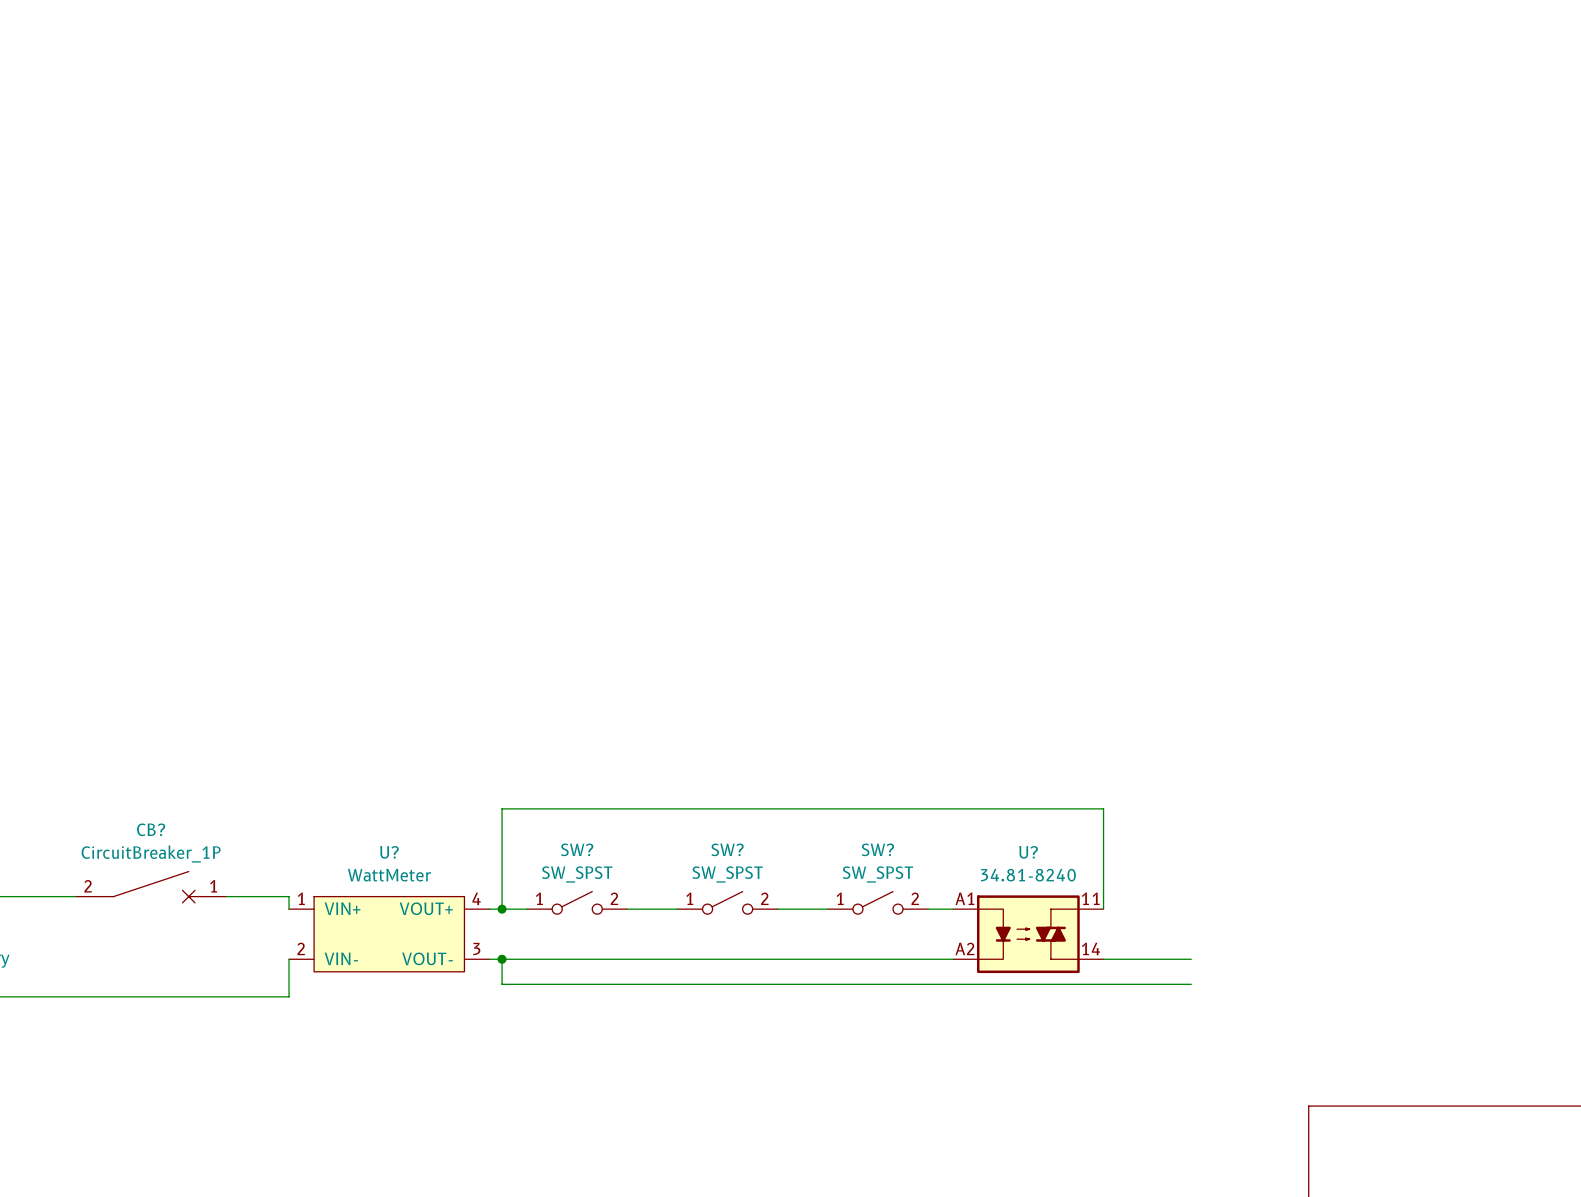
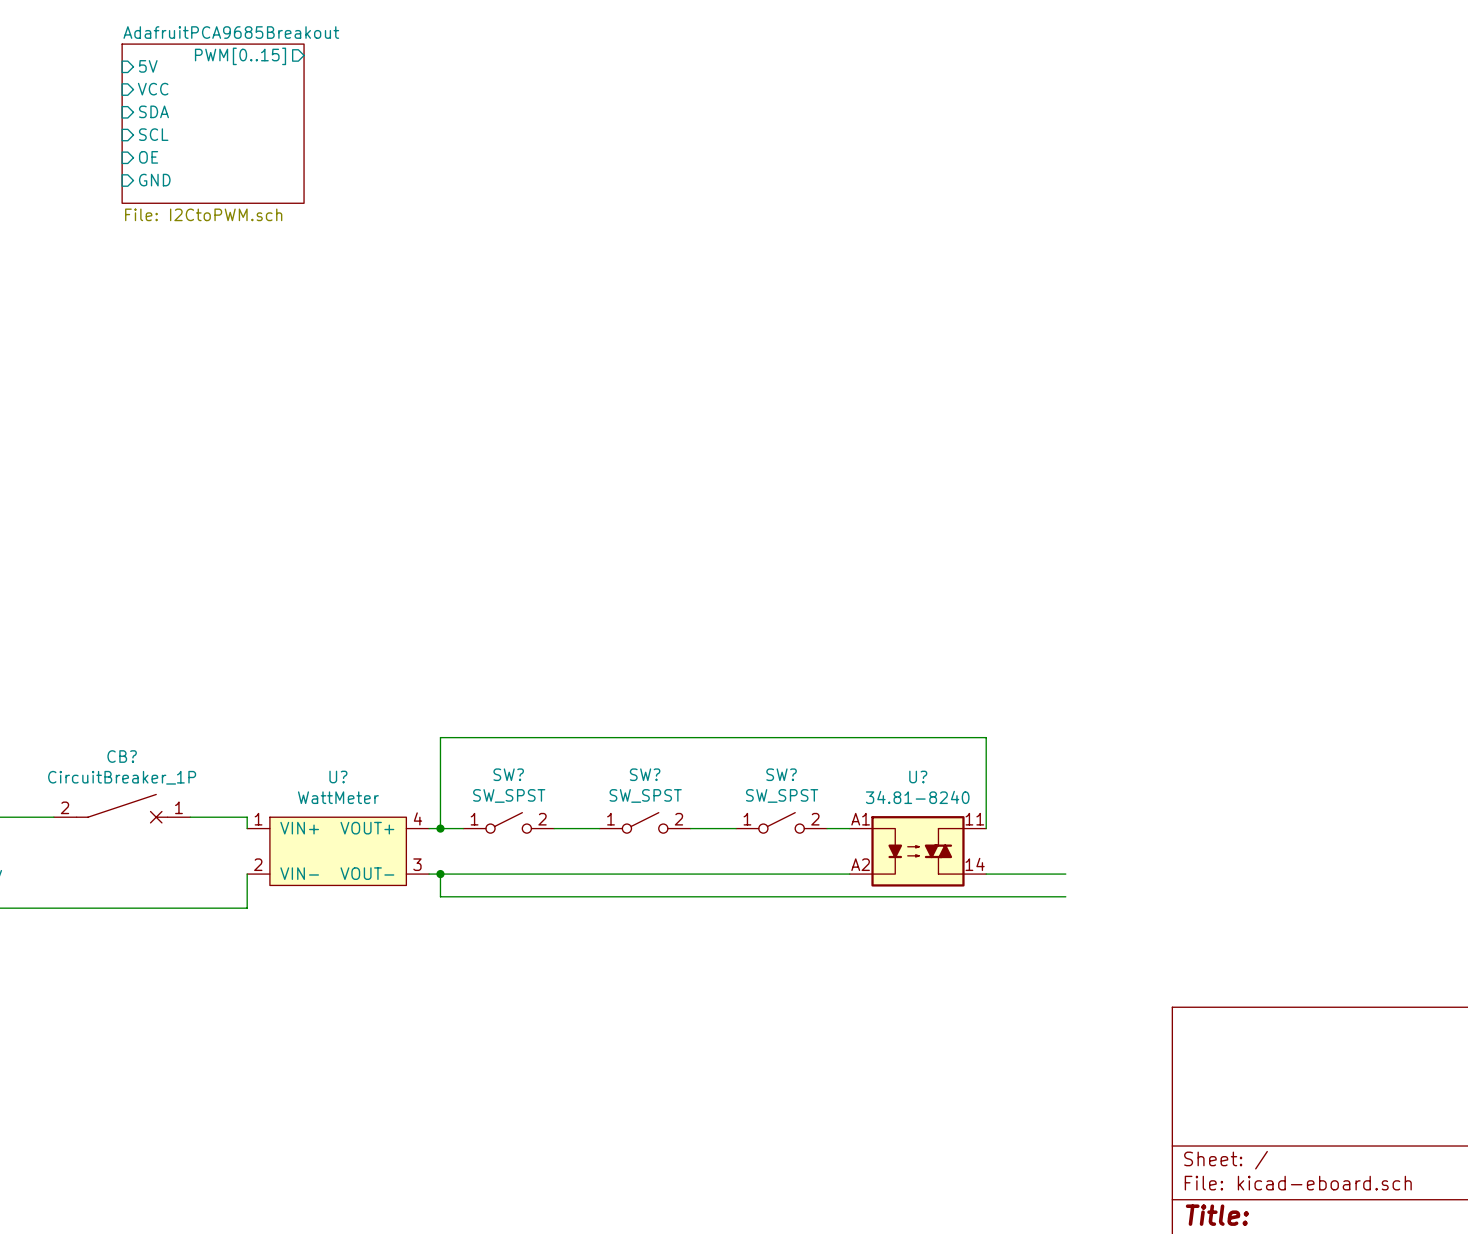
sheet pin: none -> PWM[0..15] (240, 56)
sheet pin: none -> 5V (148, 66)
sheet pin: none -> VCC (153, 89)
sheet pin: none -> SDA (153, 111)
sheet AdafruitPCA9685Breakout: none -> File: I2CtoPWM.sch (213, 123)
sheet pin: none -> SCL (153, 134)
sheet pin: none -> OE (148, 157)
sheet pin: none -> GND (154, 180)

